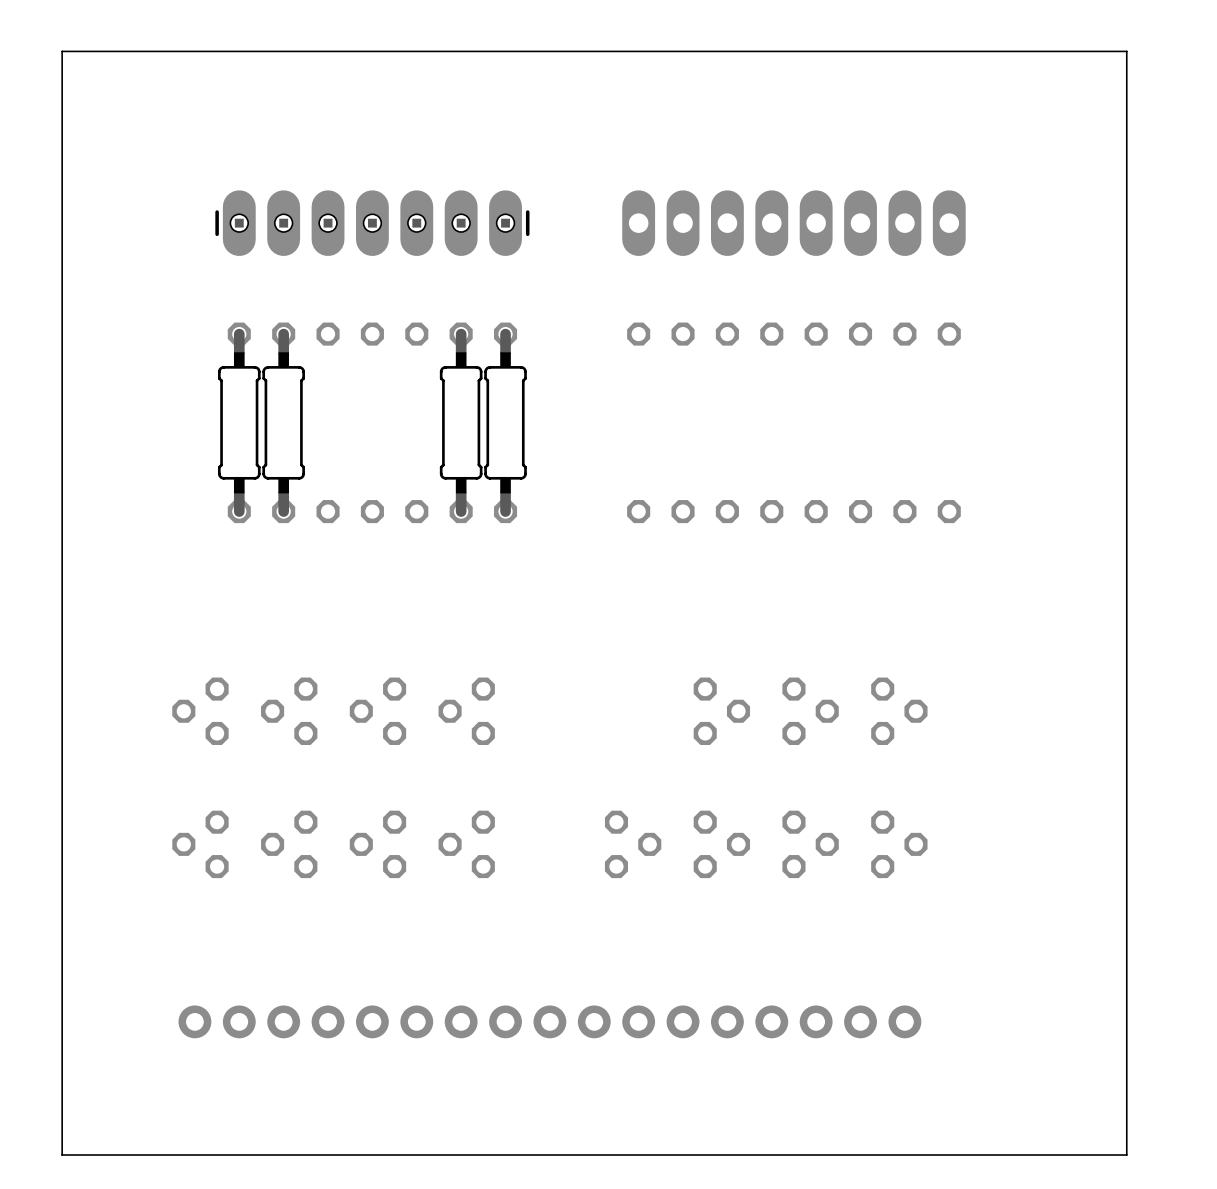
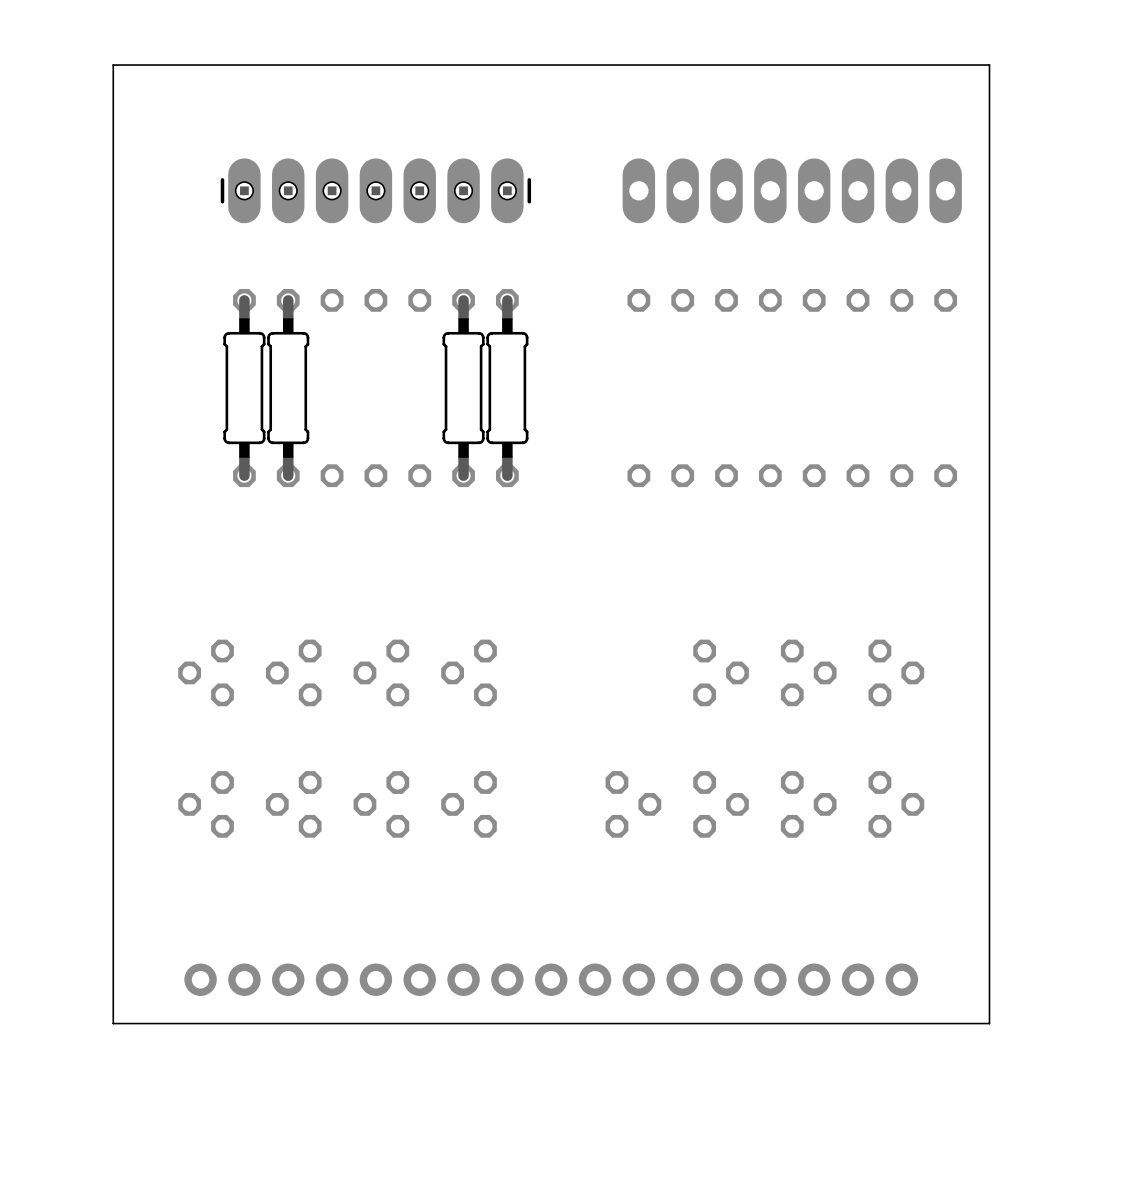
board edge: (1126, 51) (62, 51) (62, 1155) (1126, 1155) (1126, 51) -> (989, 65) (989, 1023) (113, 1023) (113, 65) (989, 65)

